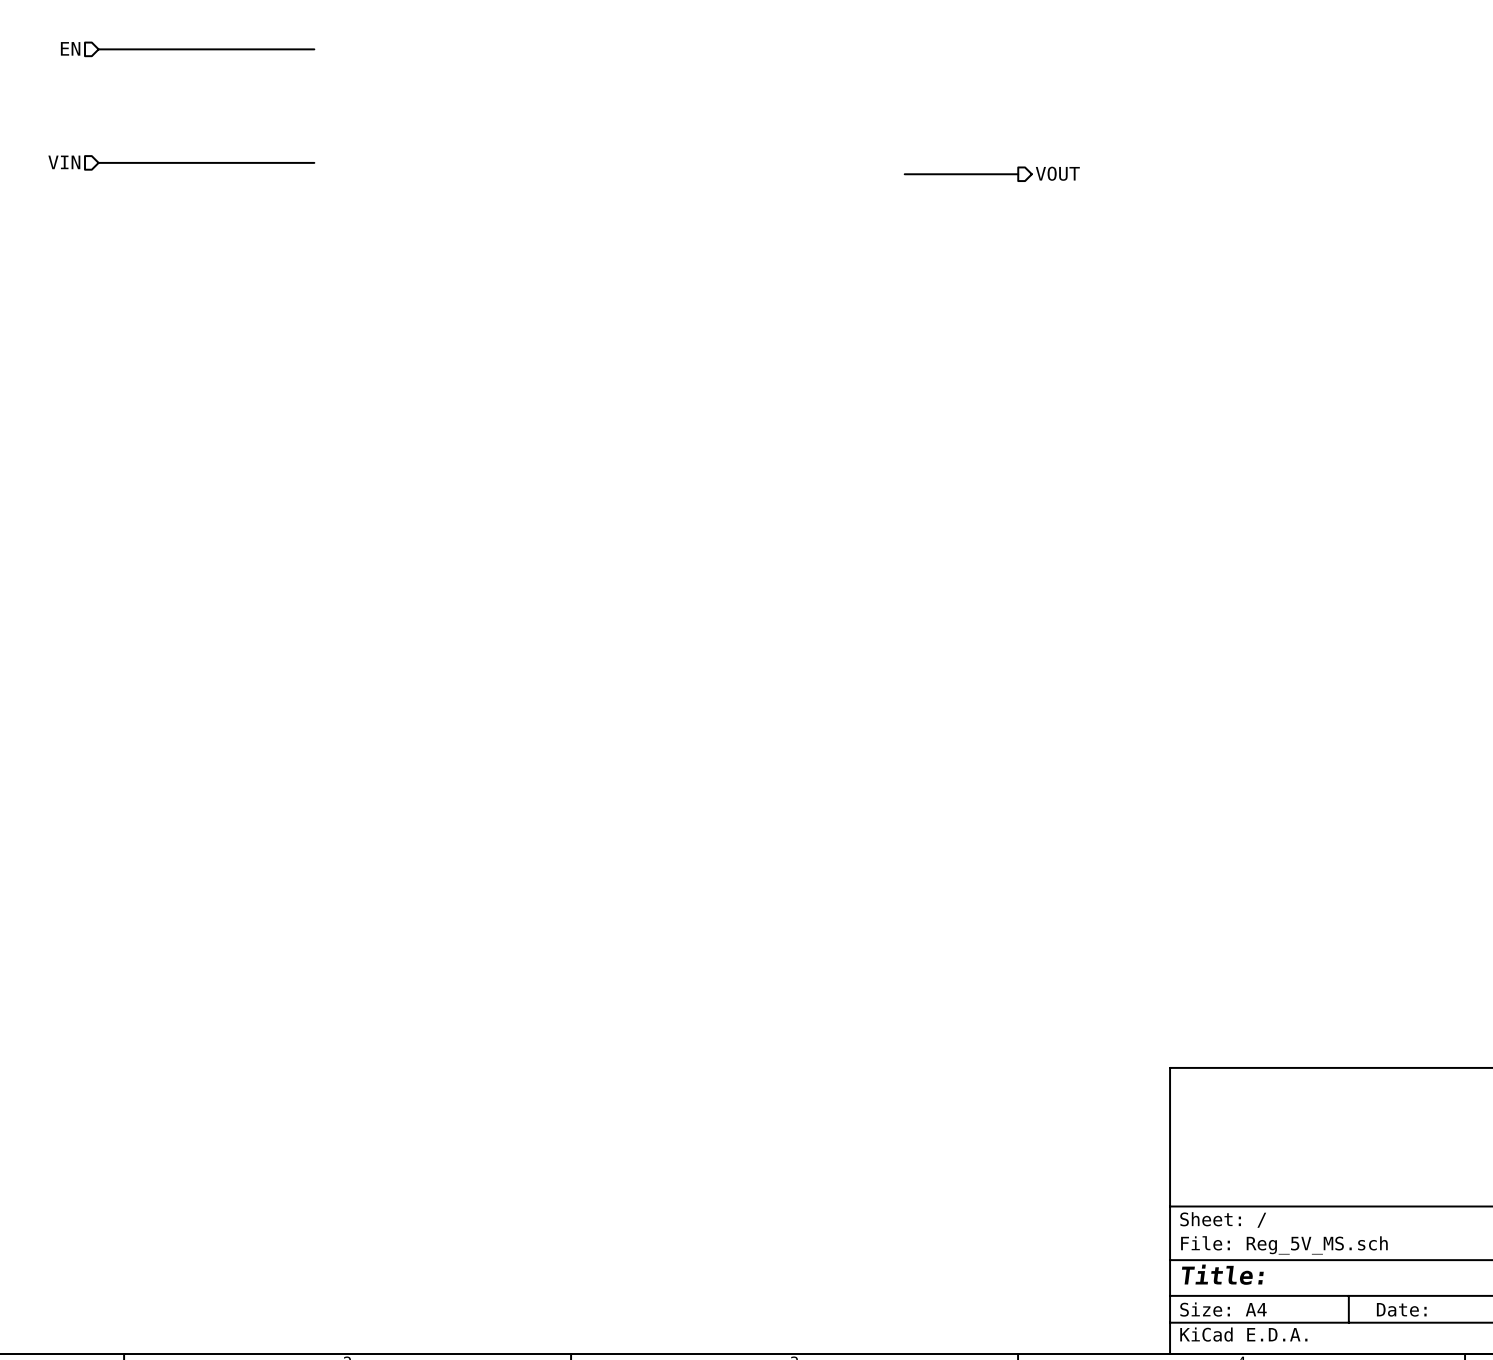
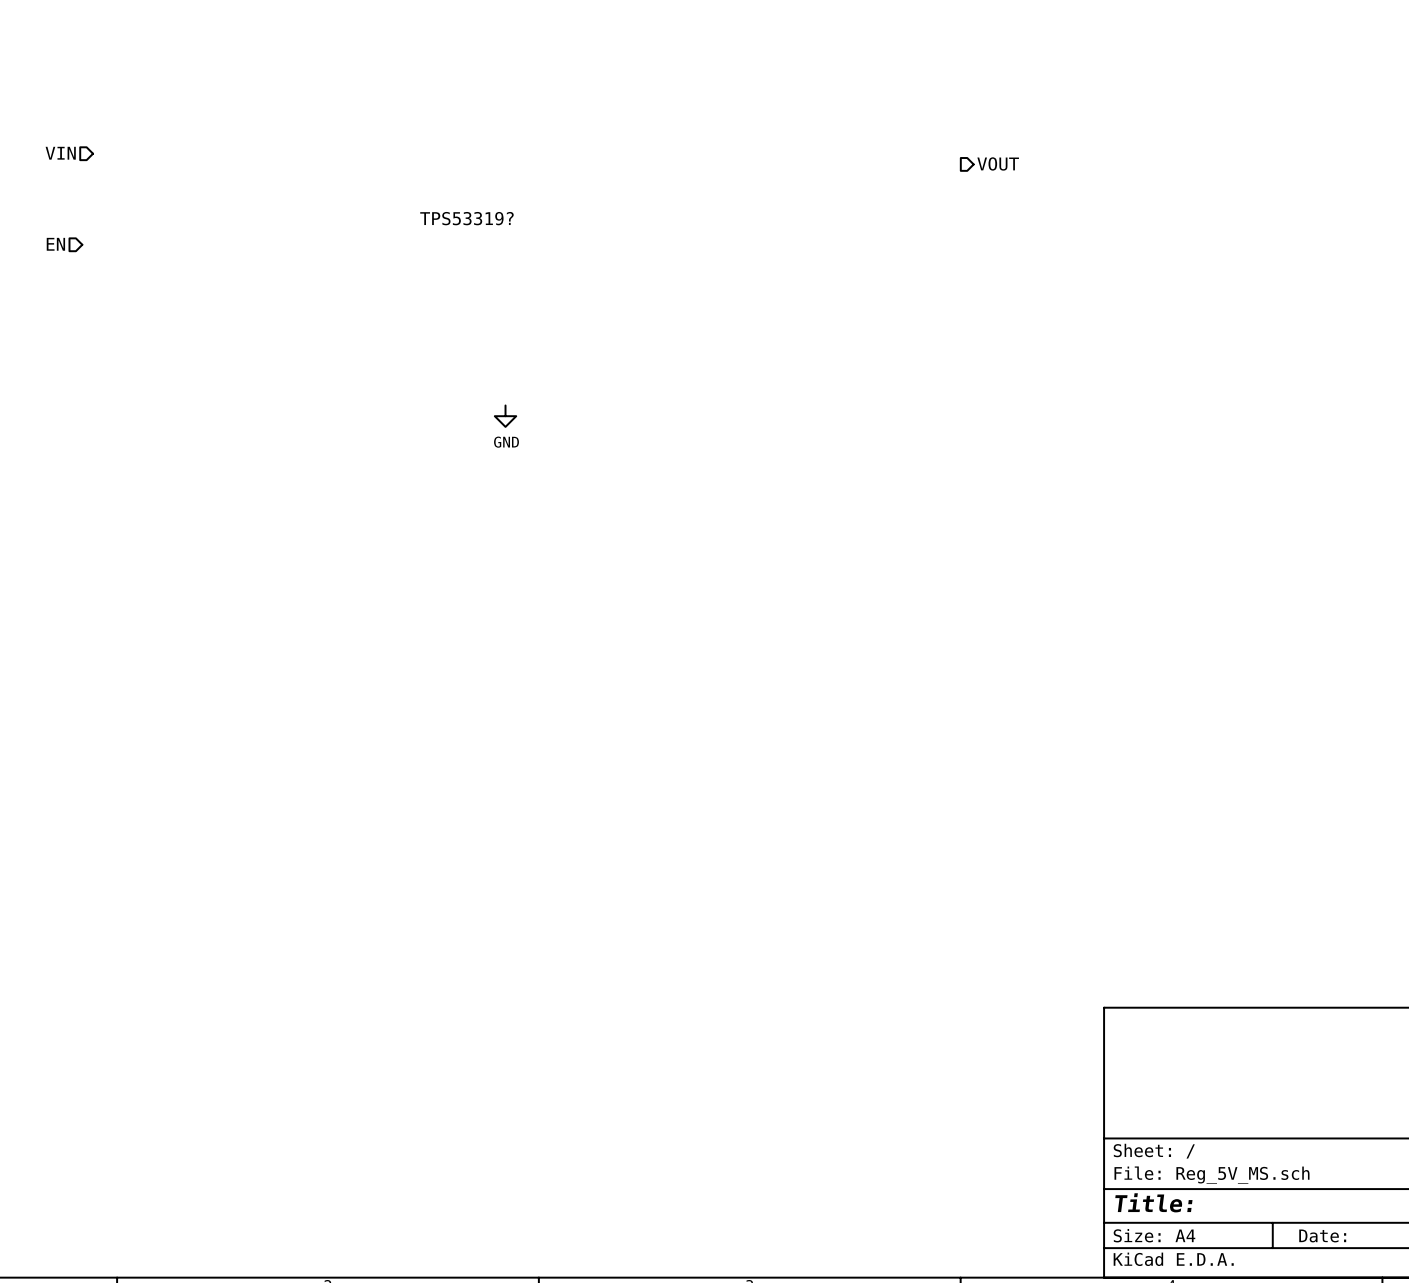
hierarchical label position: EN (70, 48) -> EN (55, 244)
wire: (98, 49) (314, 49) -> none
wire: (98, 162) (314, 162) -> none
wire: (904, 174) (1018, 174) -> none
text: none -> TPS53319? (466, 218)
power symbol: none -> GND (505, 416)

